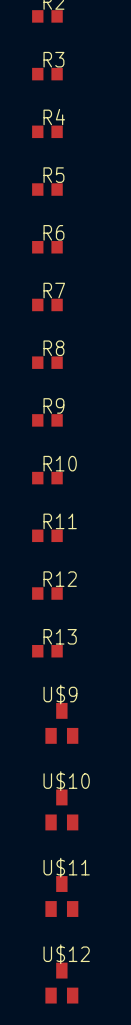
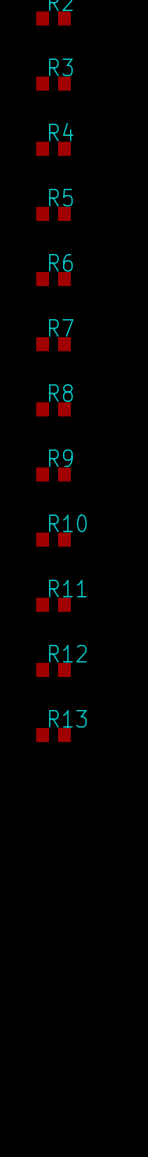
U$9: (61, 723) -> none
U$10: (61, 809) -> none
U$11: (61, 896) -> none
U$12: (61, 983) -> none

